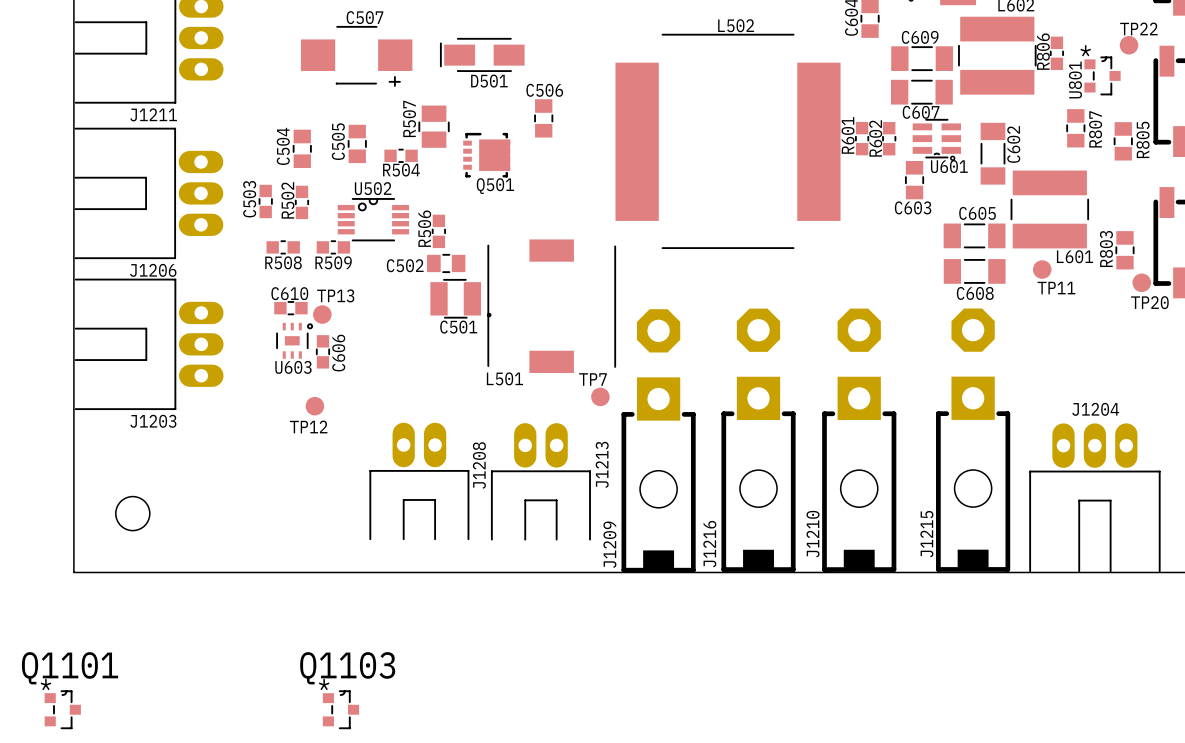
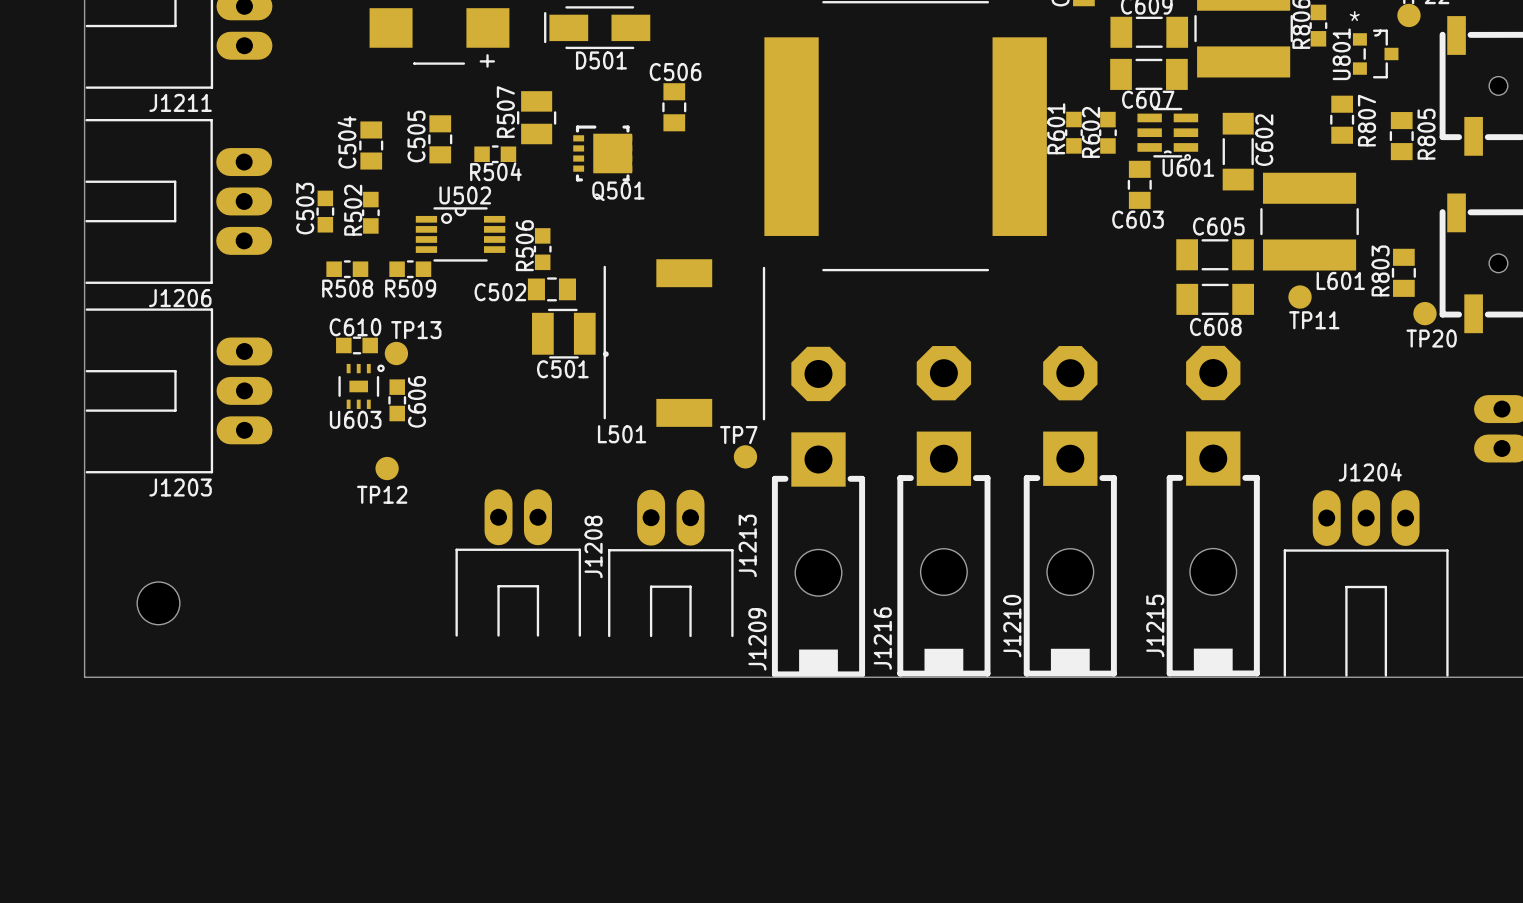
Q1101: (62, 709) -> none
Q1103: (340, 709) -> none

